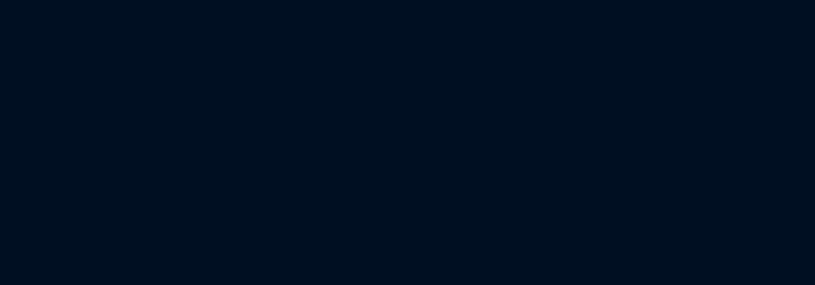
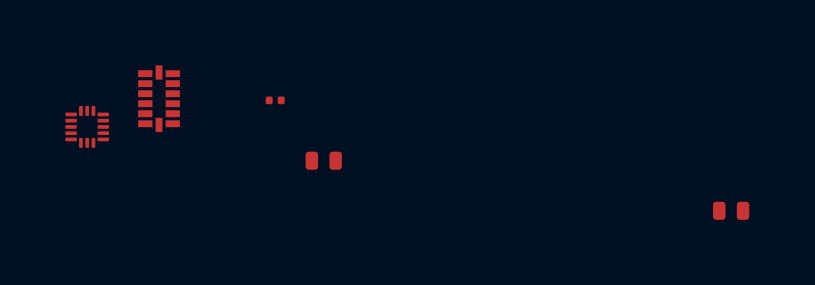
part: none -> (159, 98)
part: none -> (275, 100)
part: none -> (87, 126)
part: none -> (323, 160)
part: none -> (731, 210)

